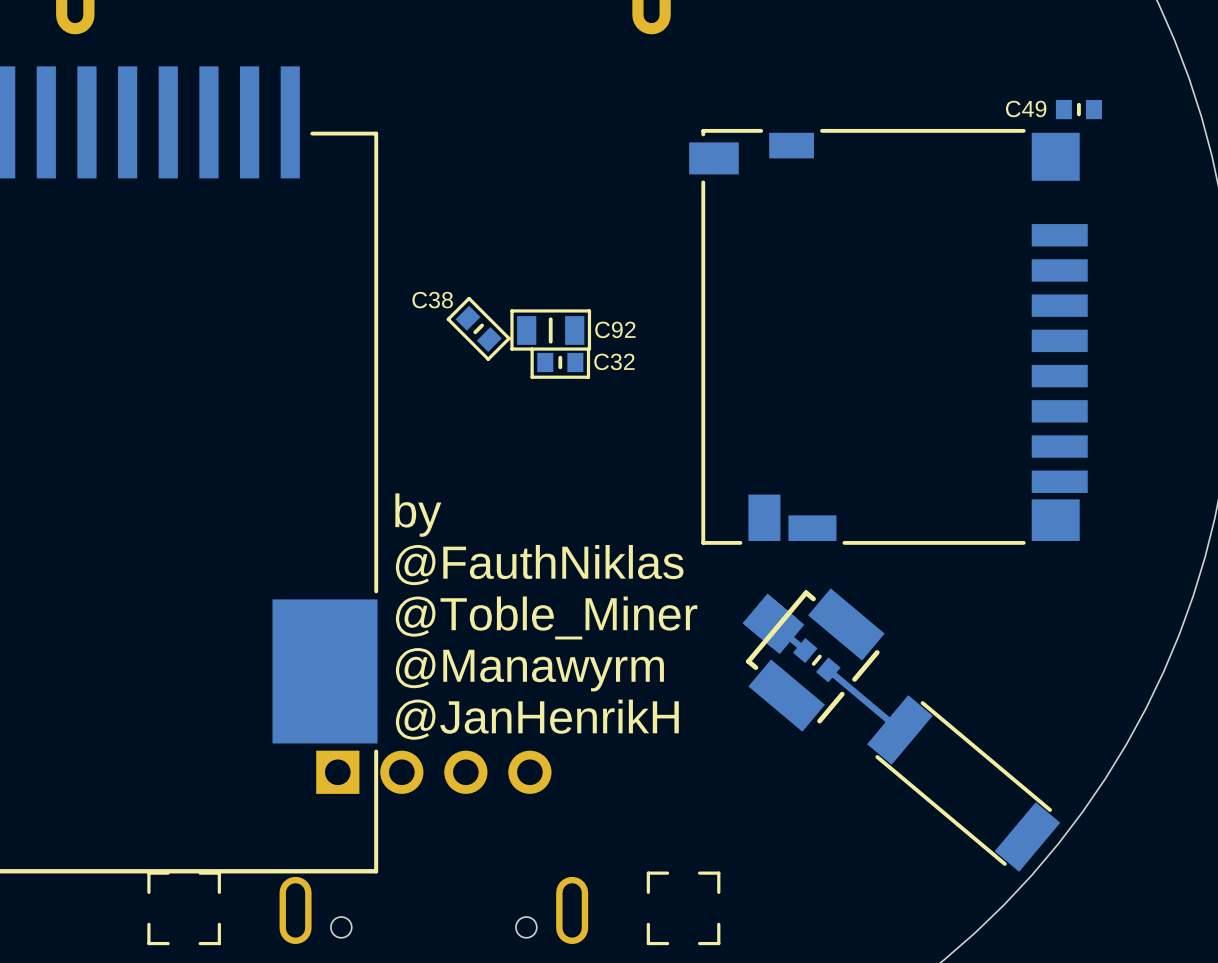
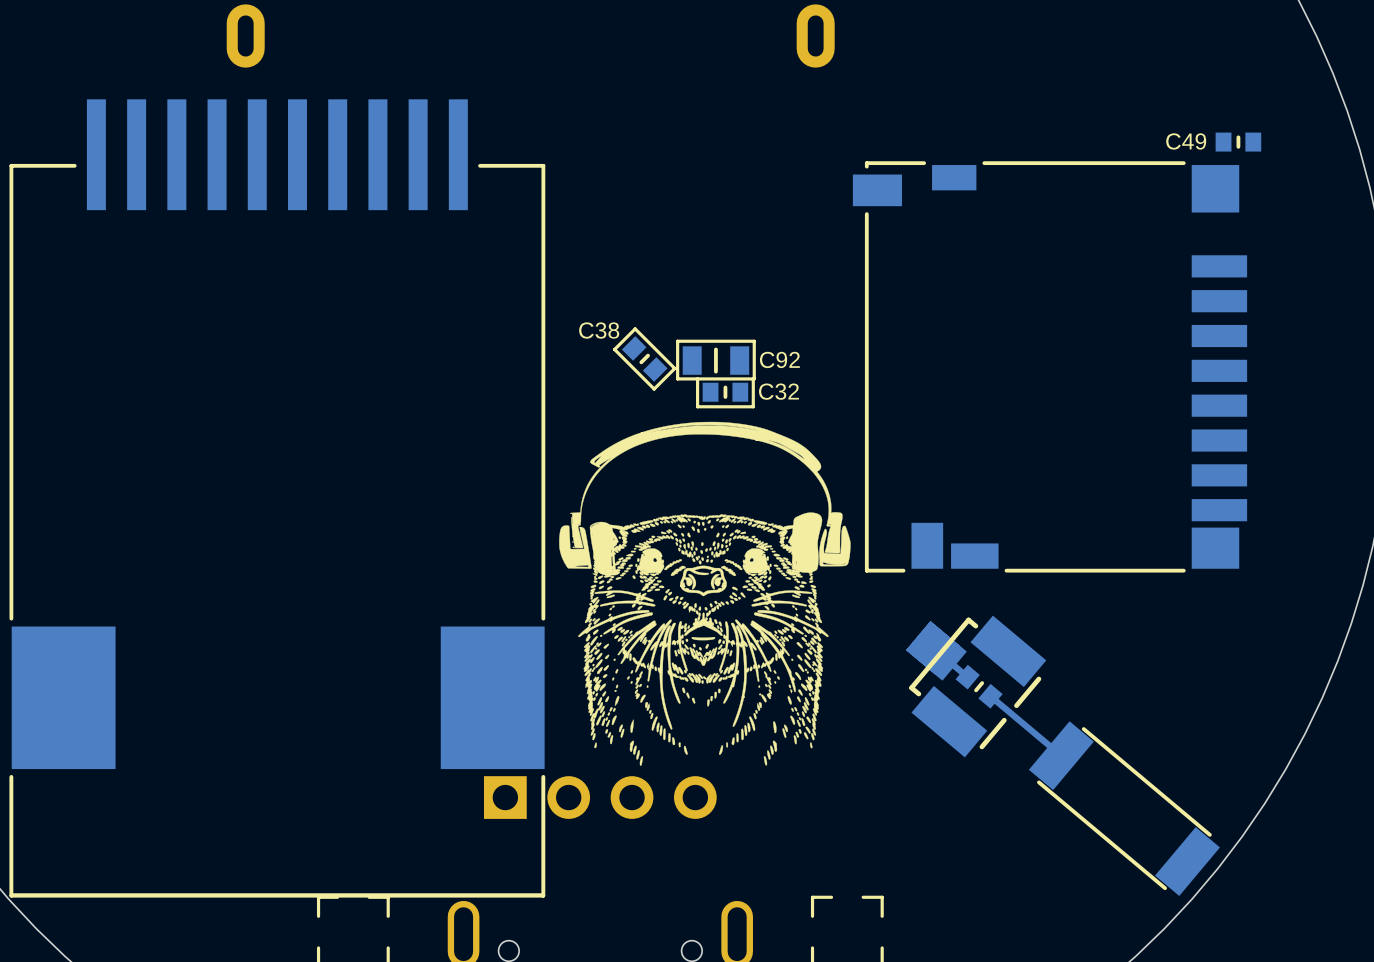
drawing: none -> [559, 421, 851, 766]
text: by (418, 515) -> none
text: @FauthNiklas (539, 565) -> none
text: @Toble_Miner (546, 617) -> none
text: @Manawyrm (529, 669) -> none
text: @JanHenrikH (537, 719) -> none

